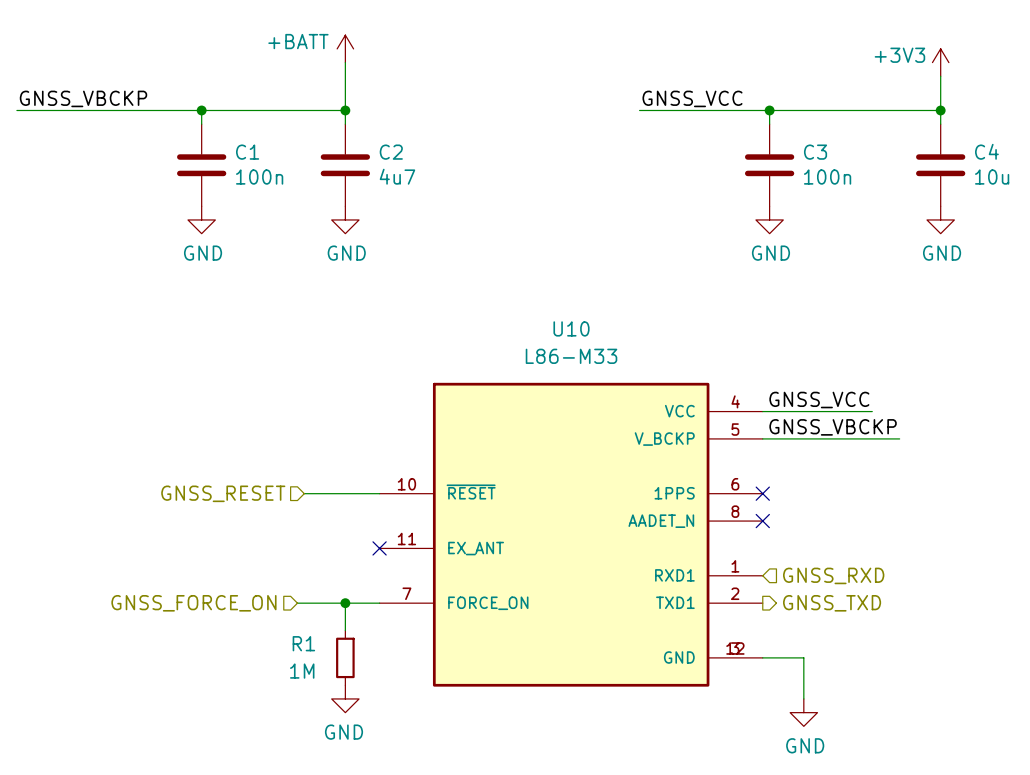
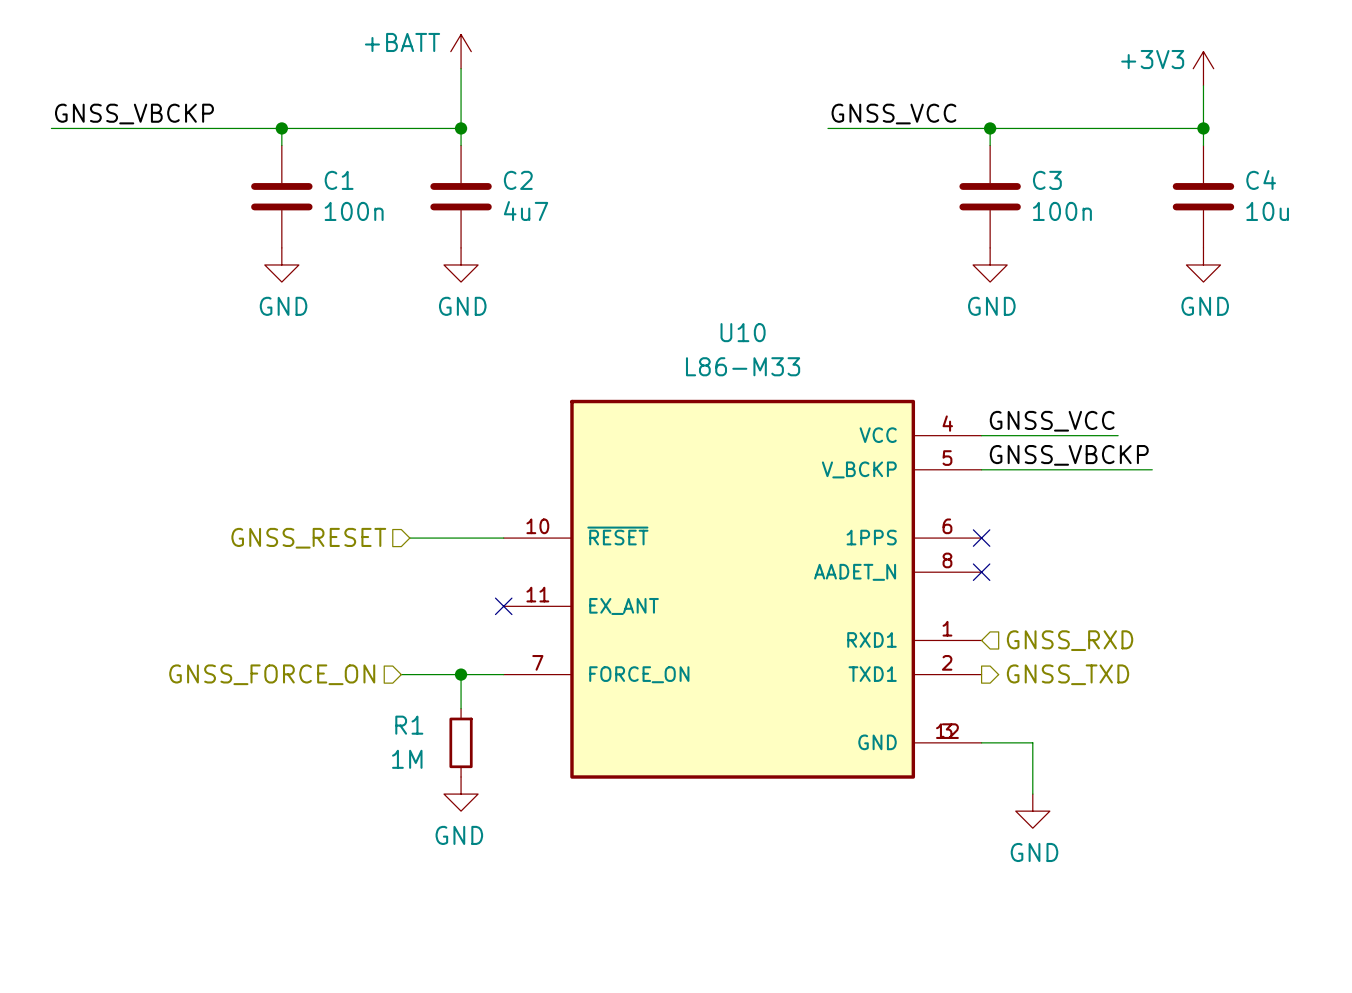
label position: GNSS_VCC (819, 400) -> GNSS_VCC (1052, 421)
wire: (762, 411) (872, 411) -> (981, 435) (1118, 435)
label position: GNSS_VBCKP (833, 427) -> GNSS_VBCKP (1069, 455)
wire: (762, 438) (899, 438) -> (981, 469) (1152, 469)
no-connect mark: none -> (981, 538)
no-connect mark: none -> (981, 572)
hierarchical label position: GNSS_RESET (223, 493) -> GNSS_RESET (308, 538)
wire: (304, 493) (379, 493) -> (409, 538) (503, 538)
no-connect mark: (762, 493) -> none
no-connect mark: (762, 521) -> none
U10 position: (571, 534) -> (742, 589)
no-connect mark position: (379, 548) -> (503, 606)
hierarchical label position: GNSS_RXD (833, 575) -> GNSS_RXD (1070, 640)
hierarchical label position: GNSS_FORCE_ON (193, 603) -> GNSS_FORCE_ON (272, 674)
wire: (297, 603) (379, 603) -> (401, 674) (503, 674)
wire: (345, 603) (345, 630) -> (461, 674) (461, 708)
junction position: (345, 603) -> (461, 674)
hierarchical label position: GNSS_TXD (832, 603) -> GNSS_TXD (1068, 674)
R1 position: (345, 657) -> (461, 742)
wire: (762, 657) (803, 657) (803, 698) -> (981, 742) (1032, 742) (1032, 794)
power symbol position: GND (345, 698) -> GND (461, 794)
power symbol position: GND (803, 712) -> GND (1032, 811)

